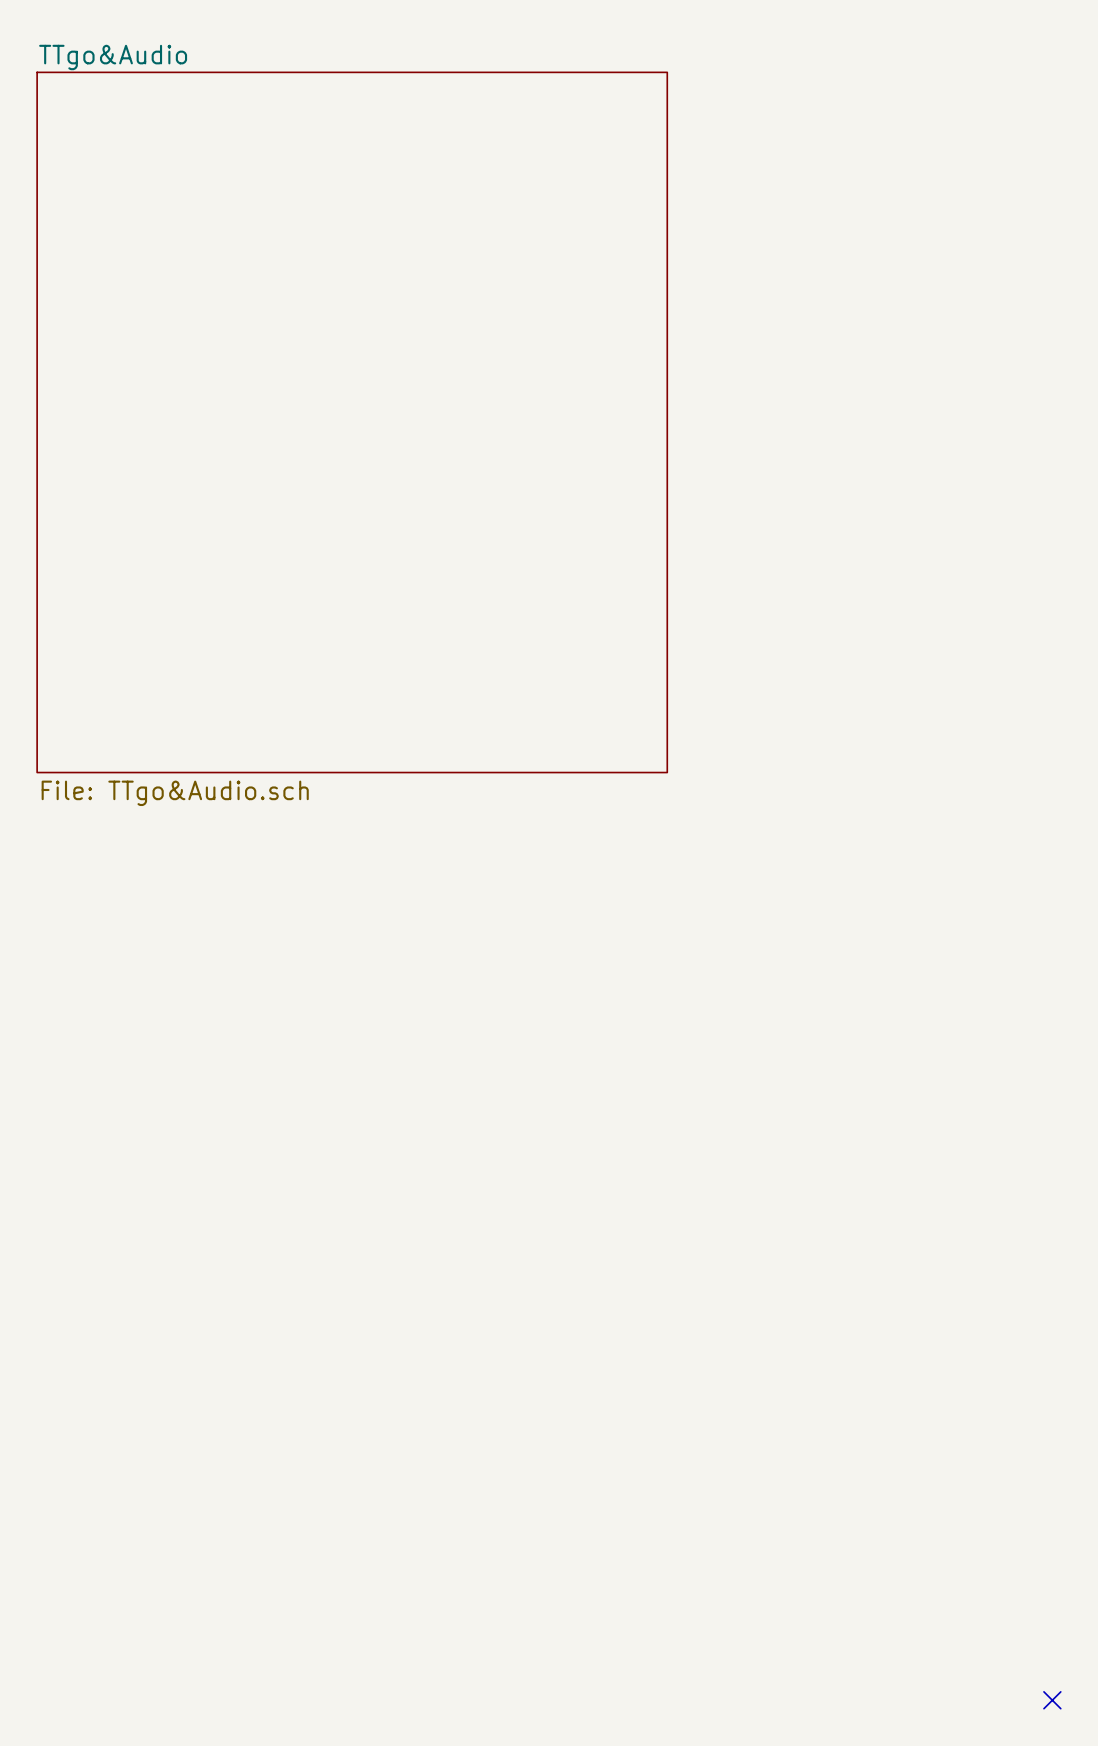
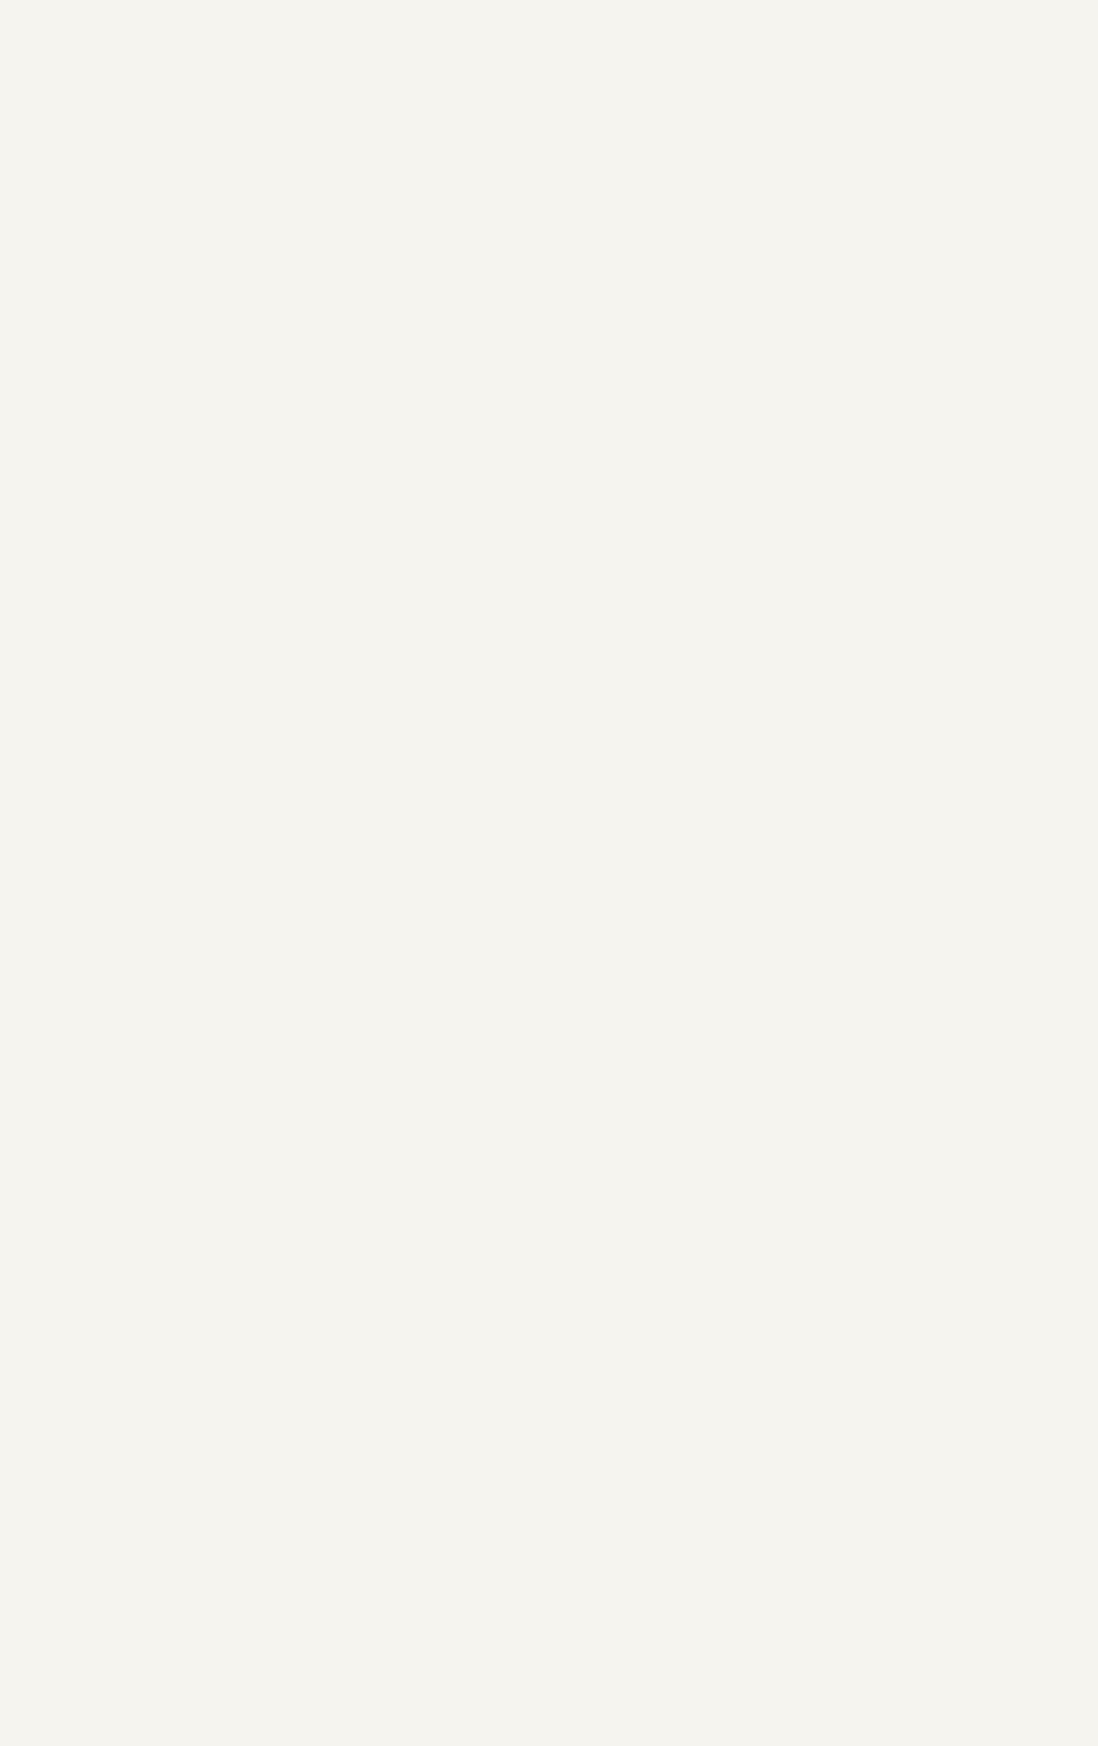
sheet TTgo&Audio: File: TTgo&Audio.sch (352, 422) -> none
no-connect mark: (1052, 1700) -> none

